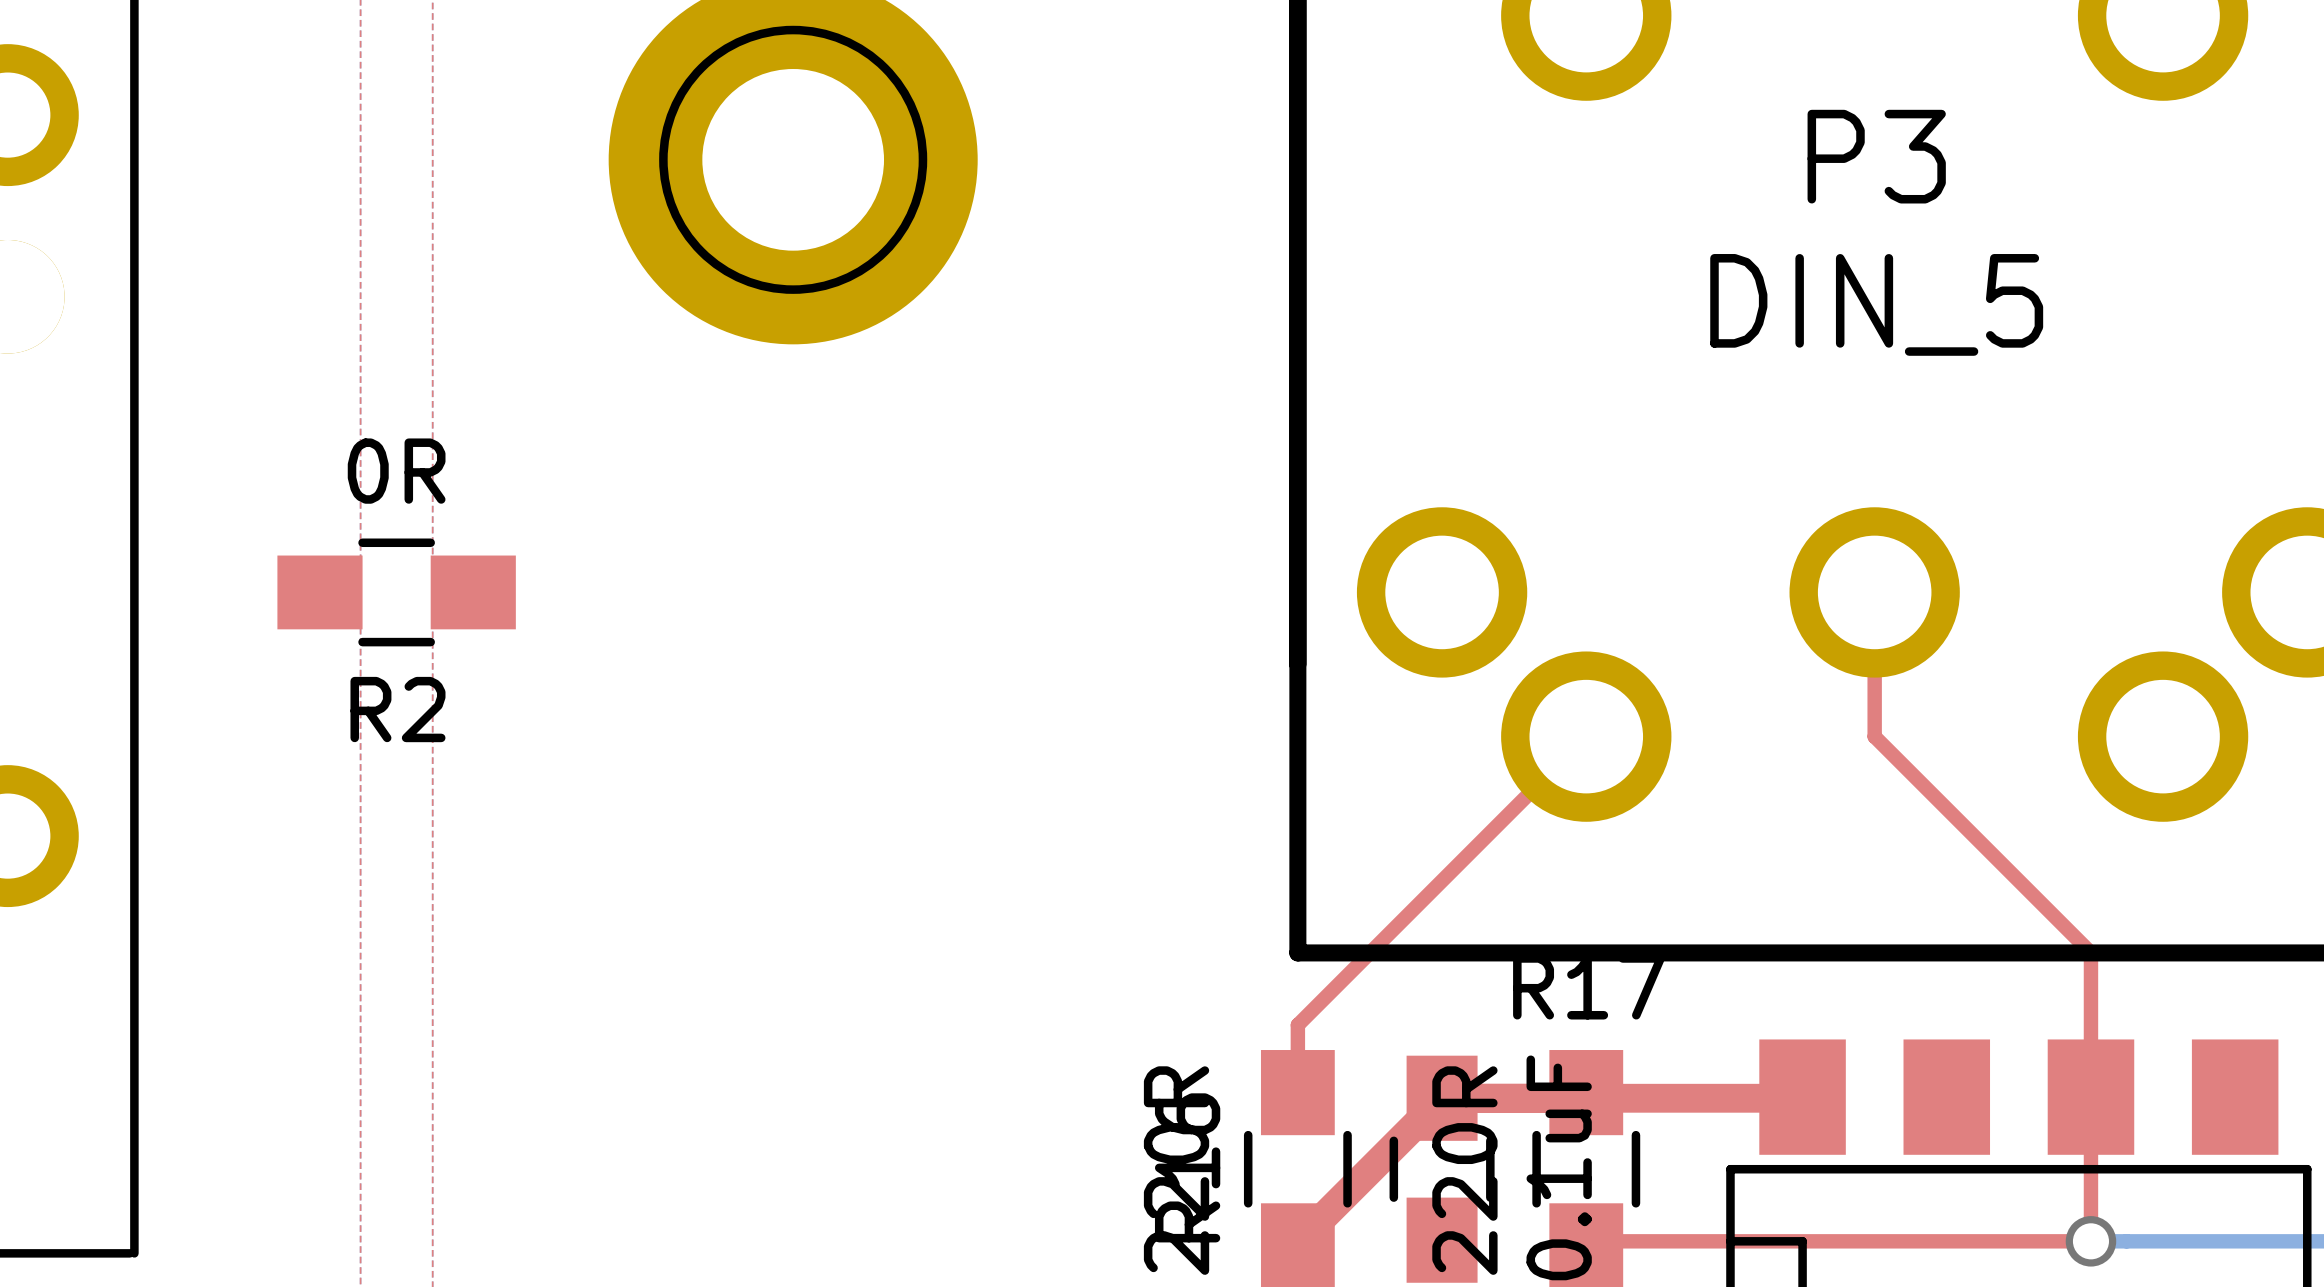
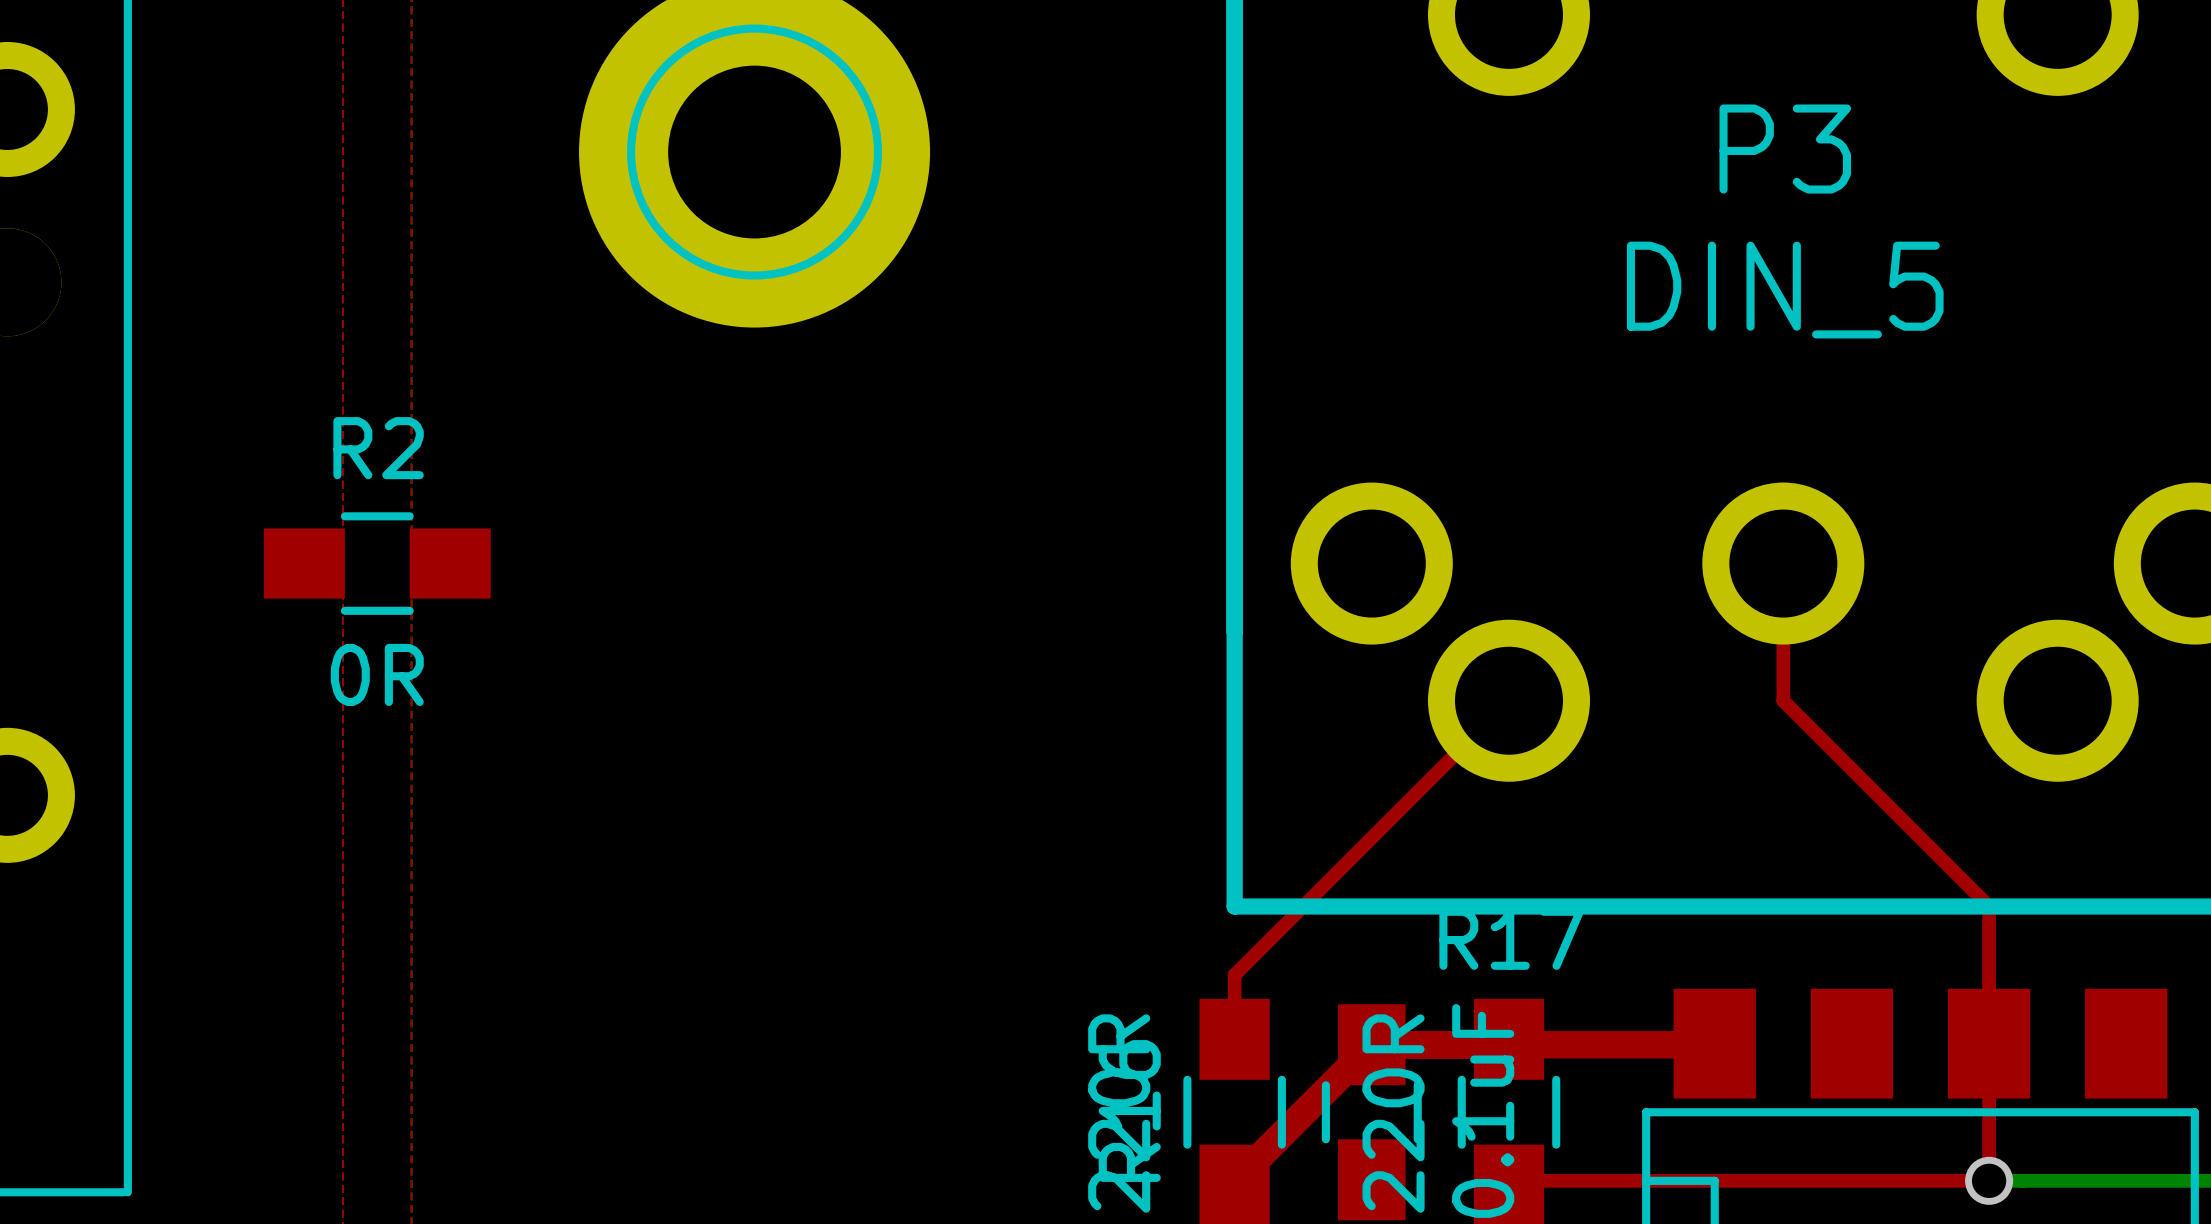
R2 value position: 0R (396, 471) -> 0R (377, 674)
R2 name position: R2 (397, 709) -> R2 (378, 448)

